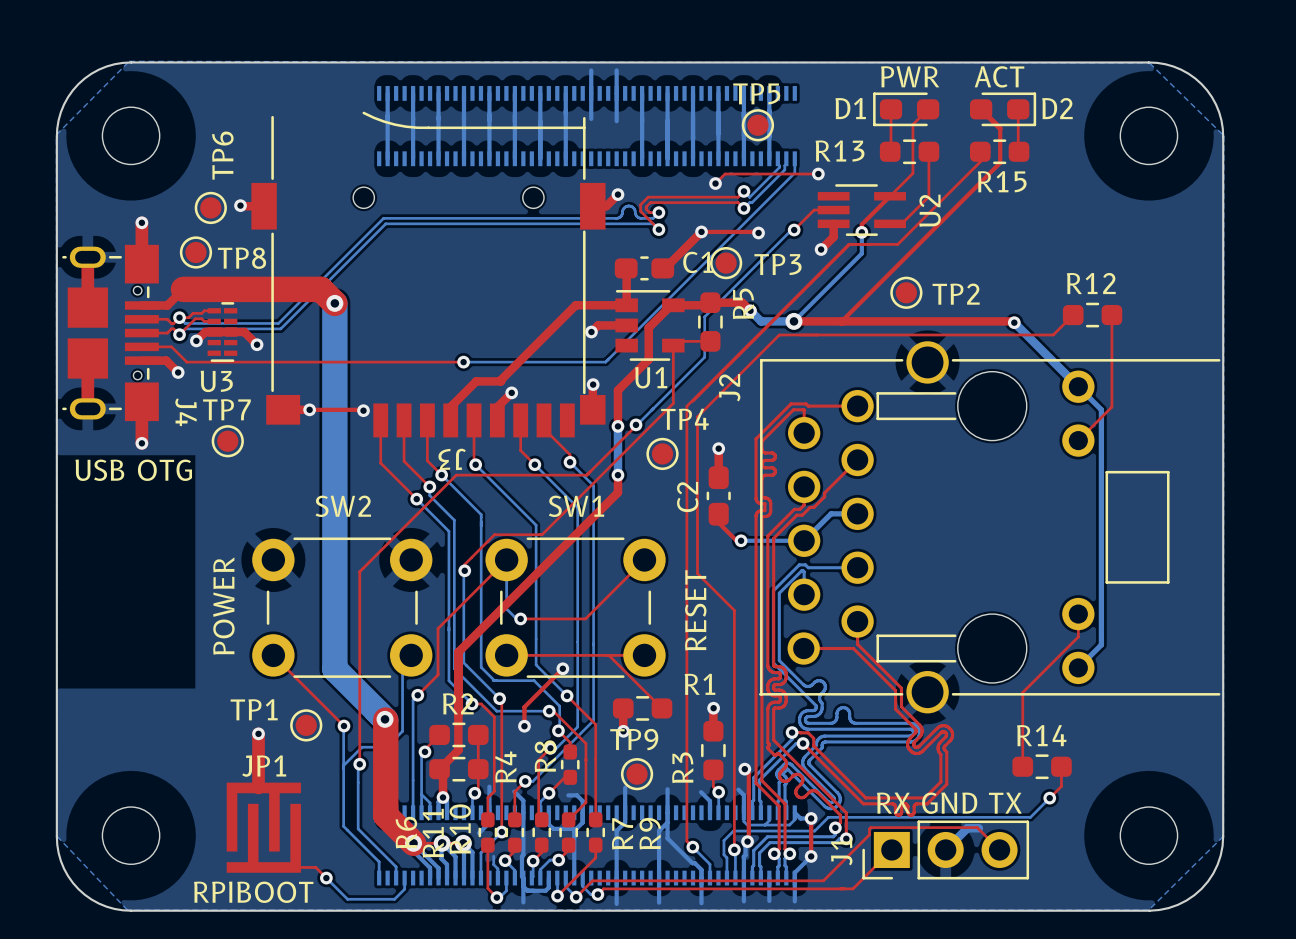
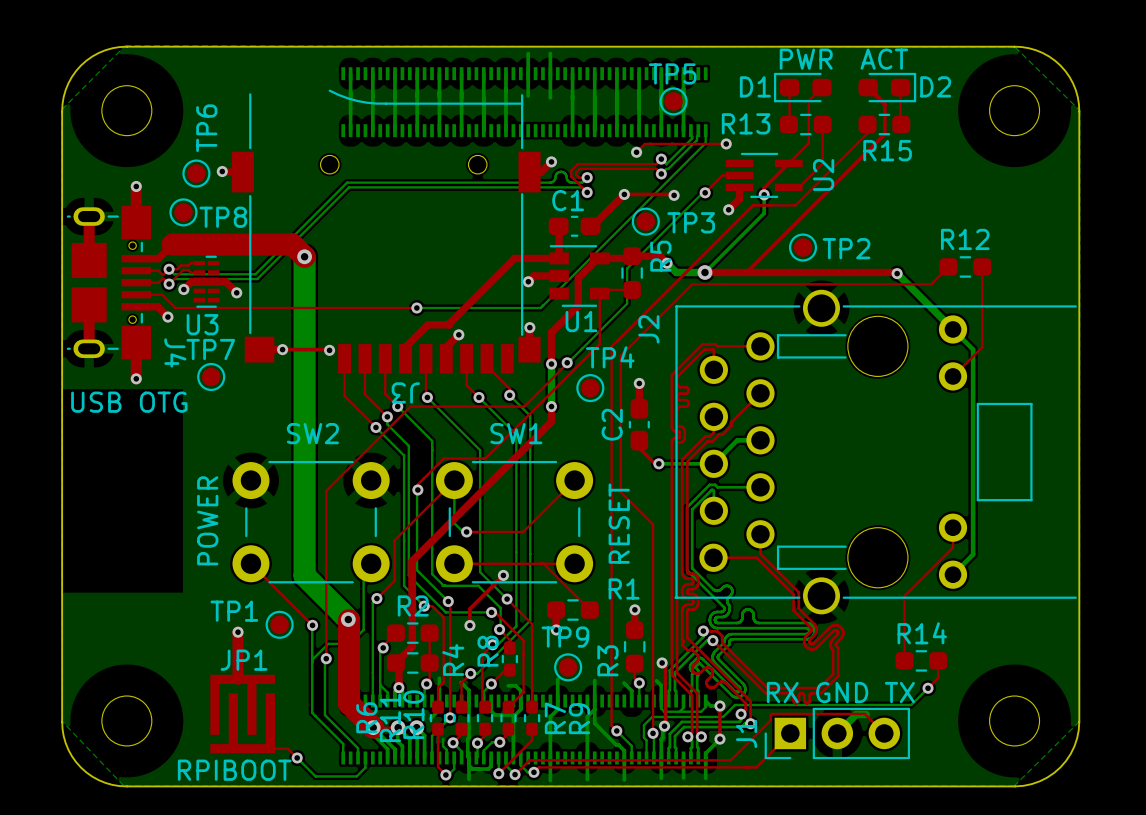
C1 name position: C1 (698, 262) -> C1 (568, 200)

